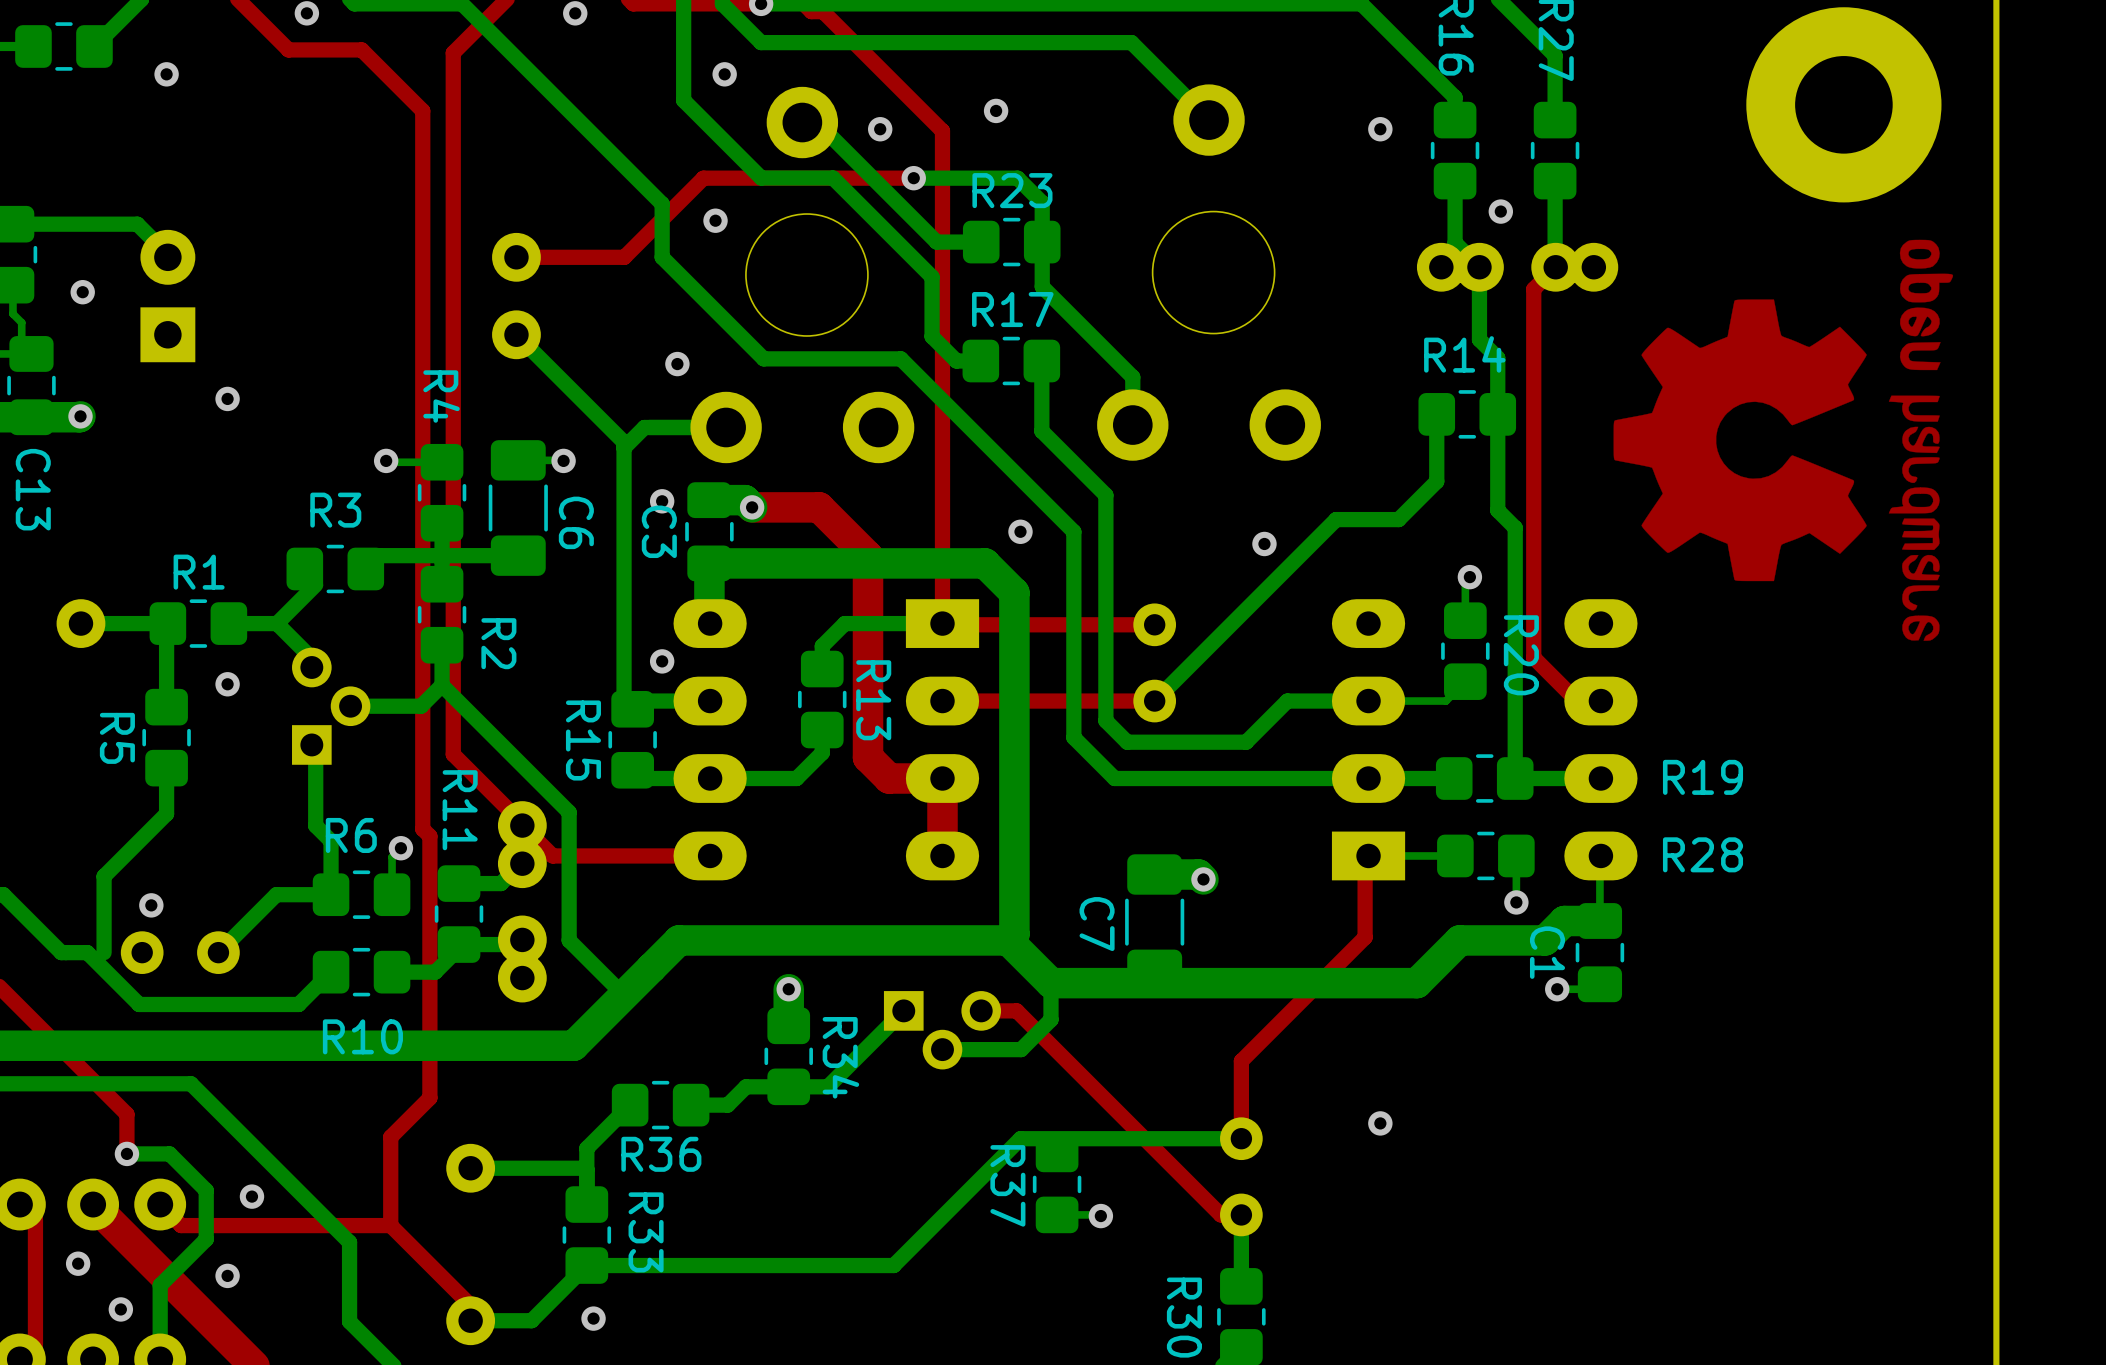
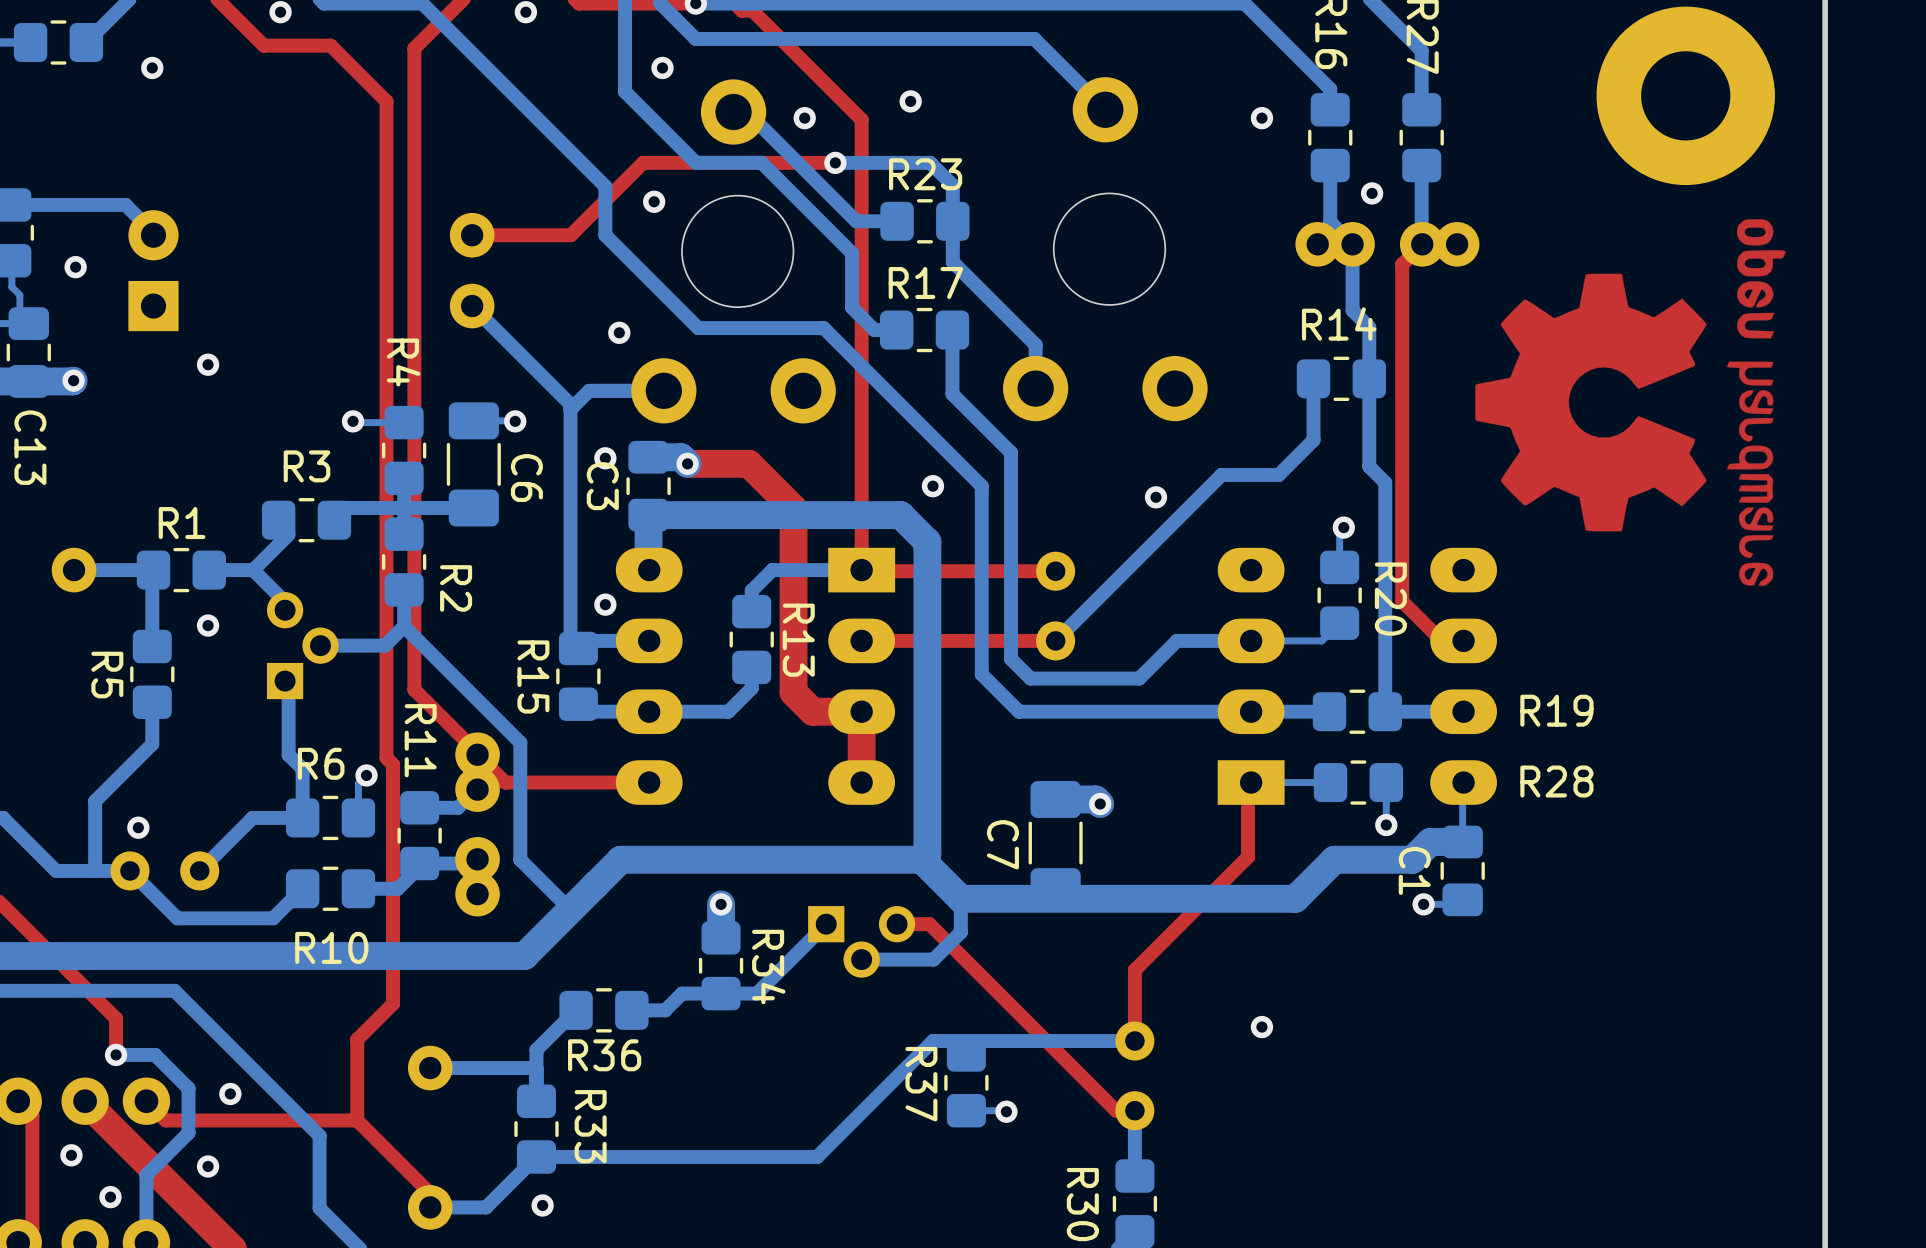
bottom track: (87, 952) (139, 1004) (194, 1004) -> (79, 870) (129, 870) (177, 918)

